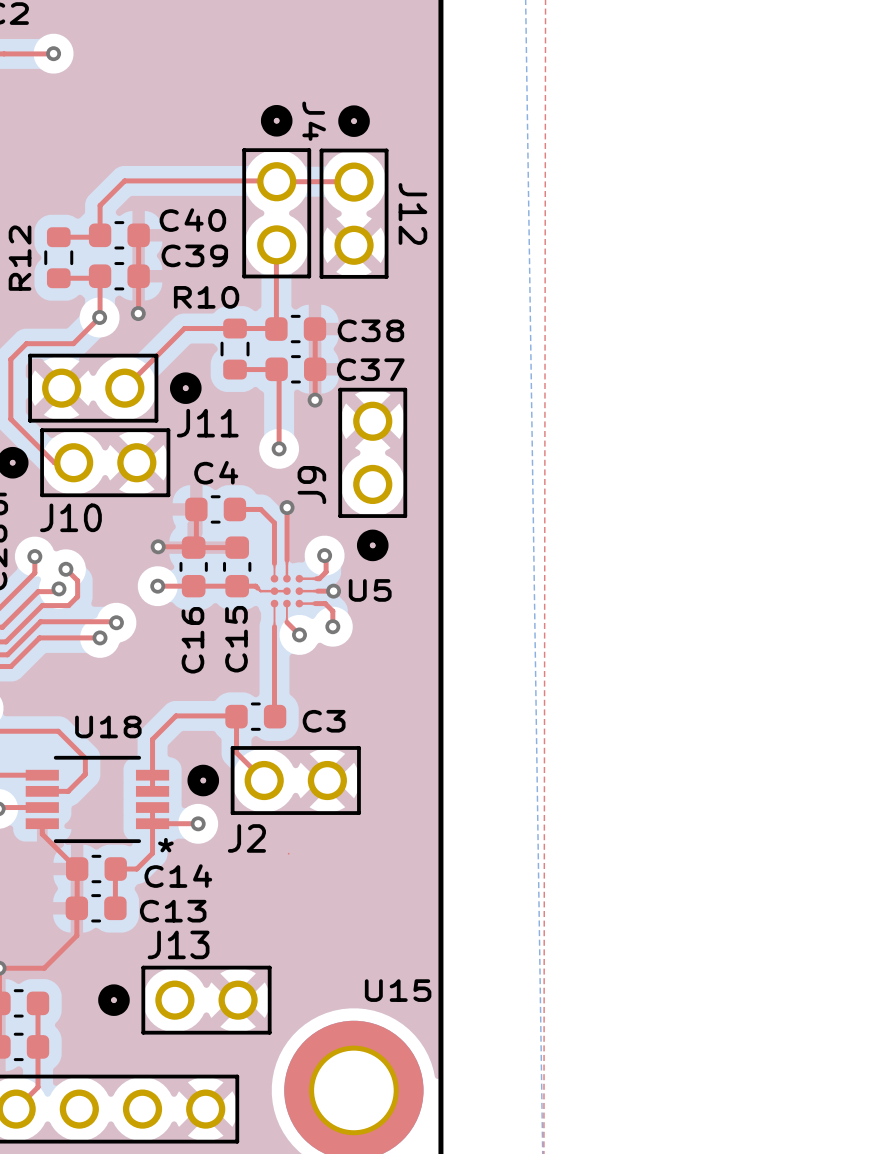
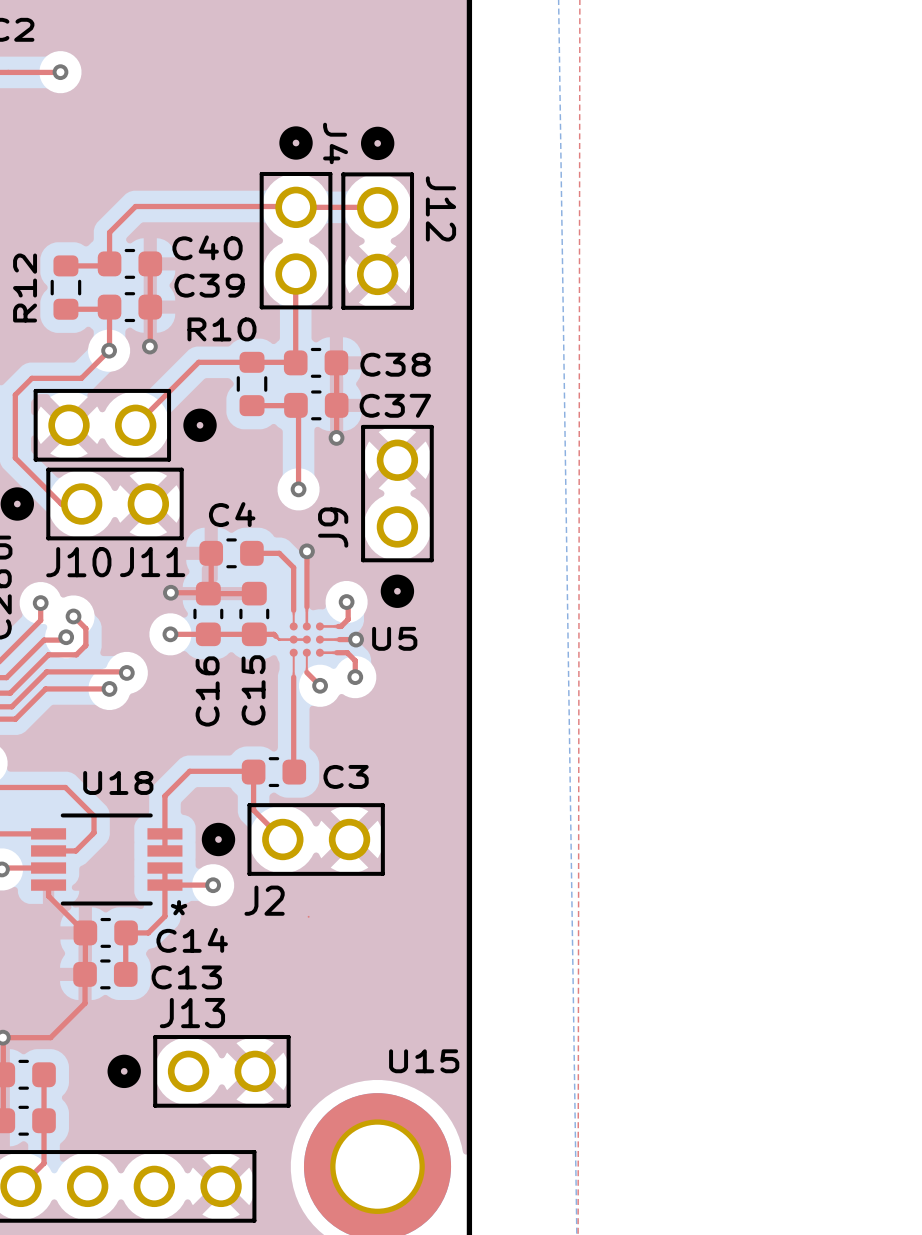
J12 name position: J12 (412, 213) -> J12 (440, 208)
J11 name position: J11 (207, 423) -> J11 (152, 562)

